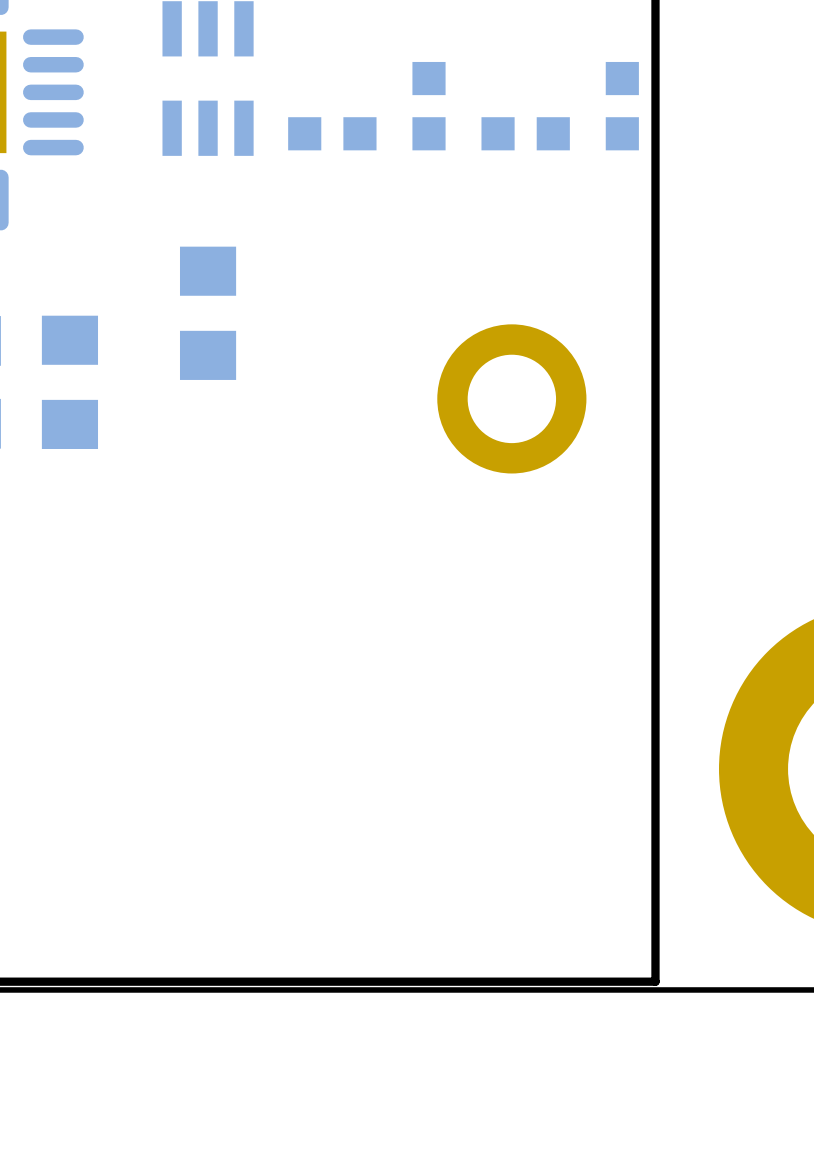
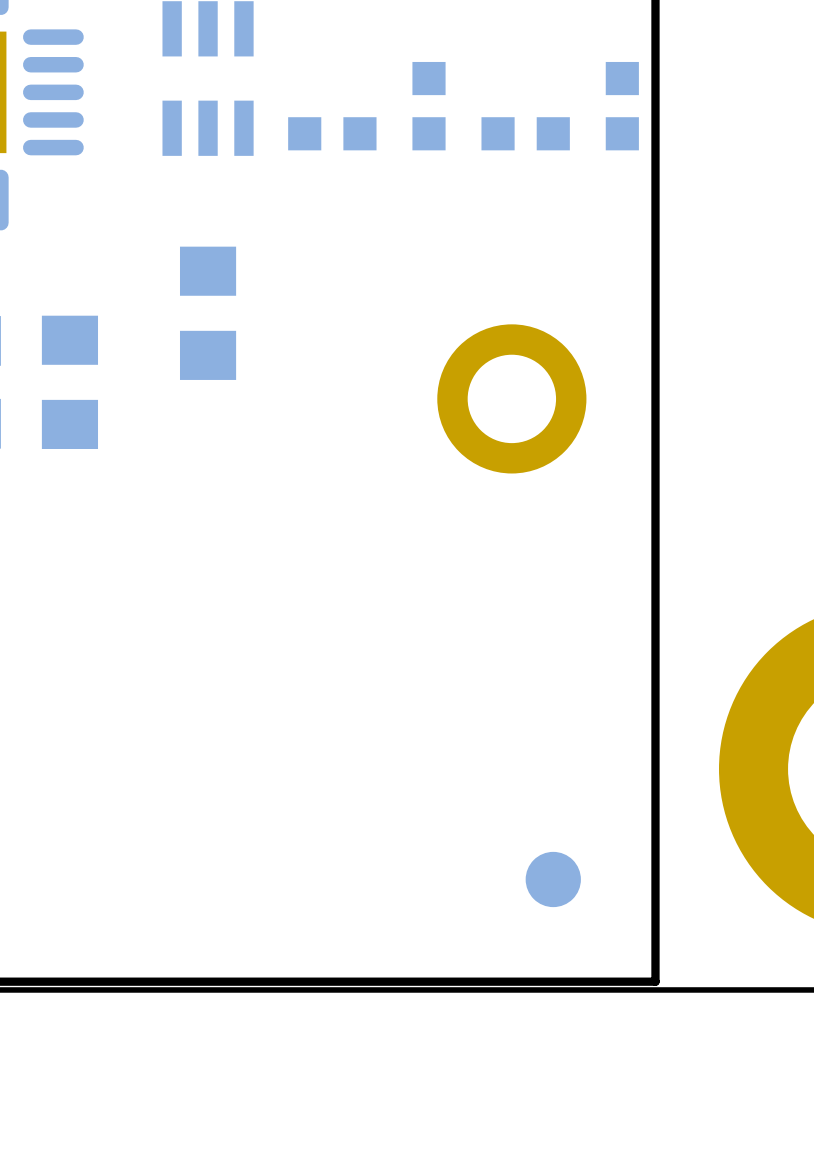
part: none -> (553, 879)

